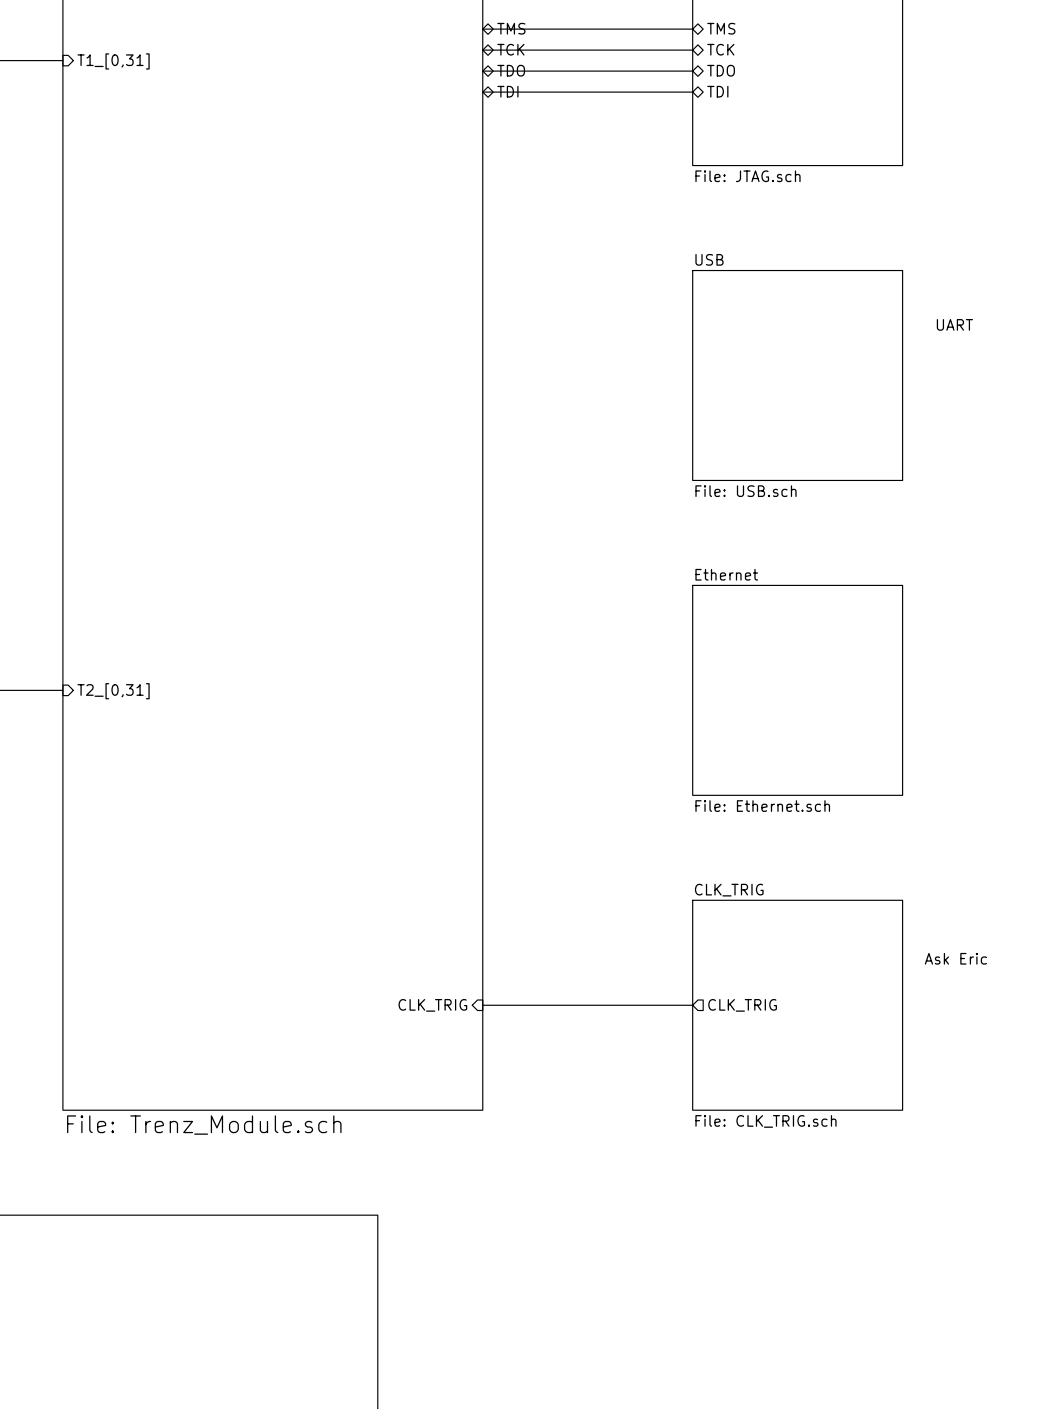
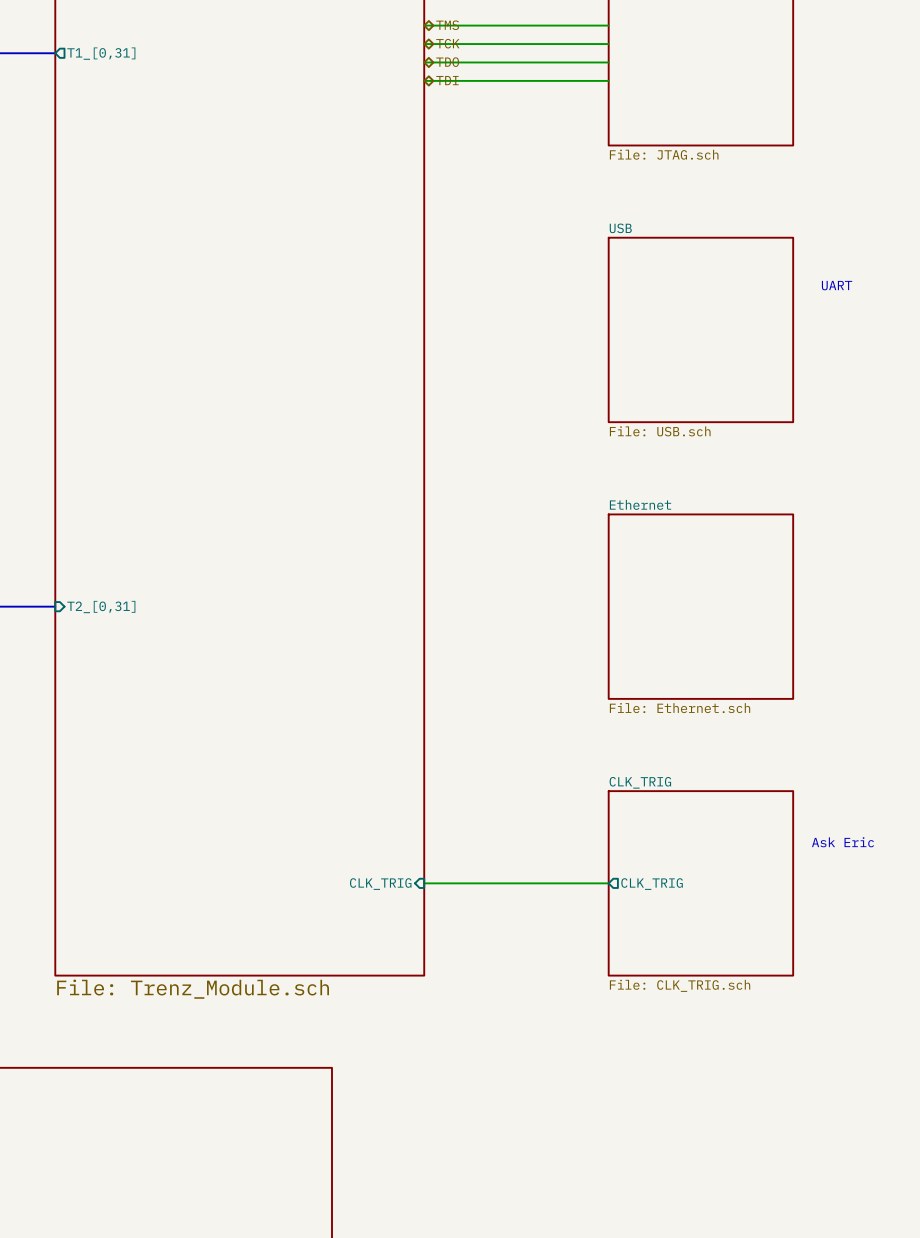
sheet pin: TMS (721, 28) -> none
sheet pin: TCK (720, 49) -> none
sheet pin shape: input (113, 61) -> output (101, 53)
sheet pin: TDO (721, 70) -> none
sheet pin: TDI (717, 91) -> none

